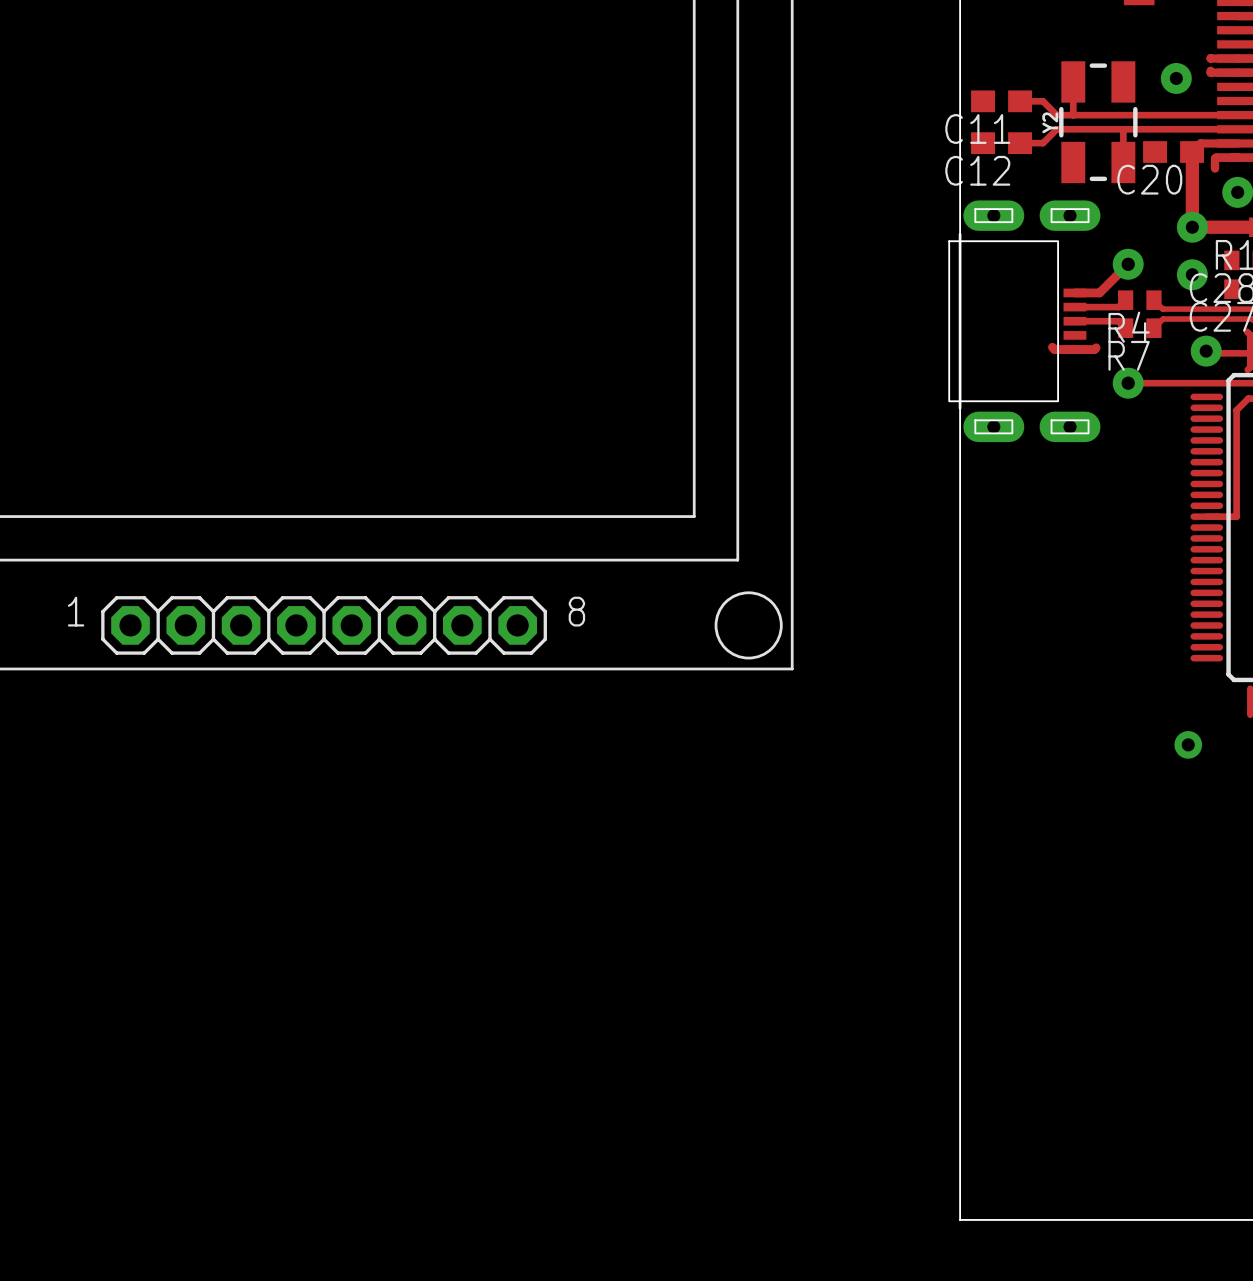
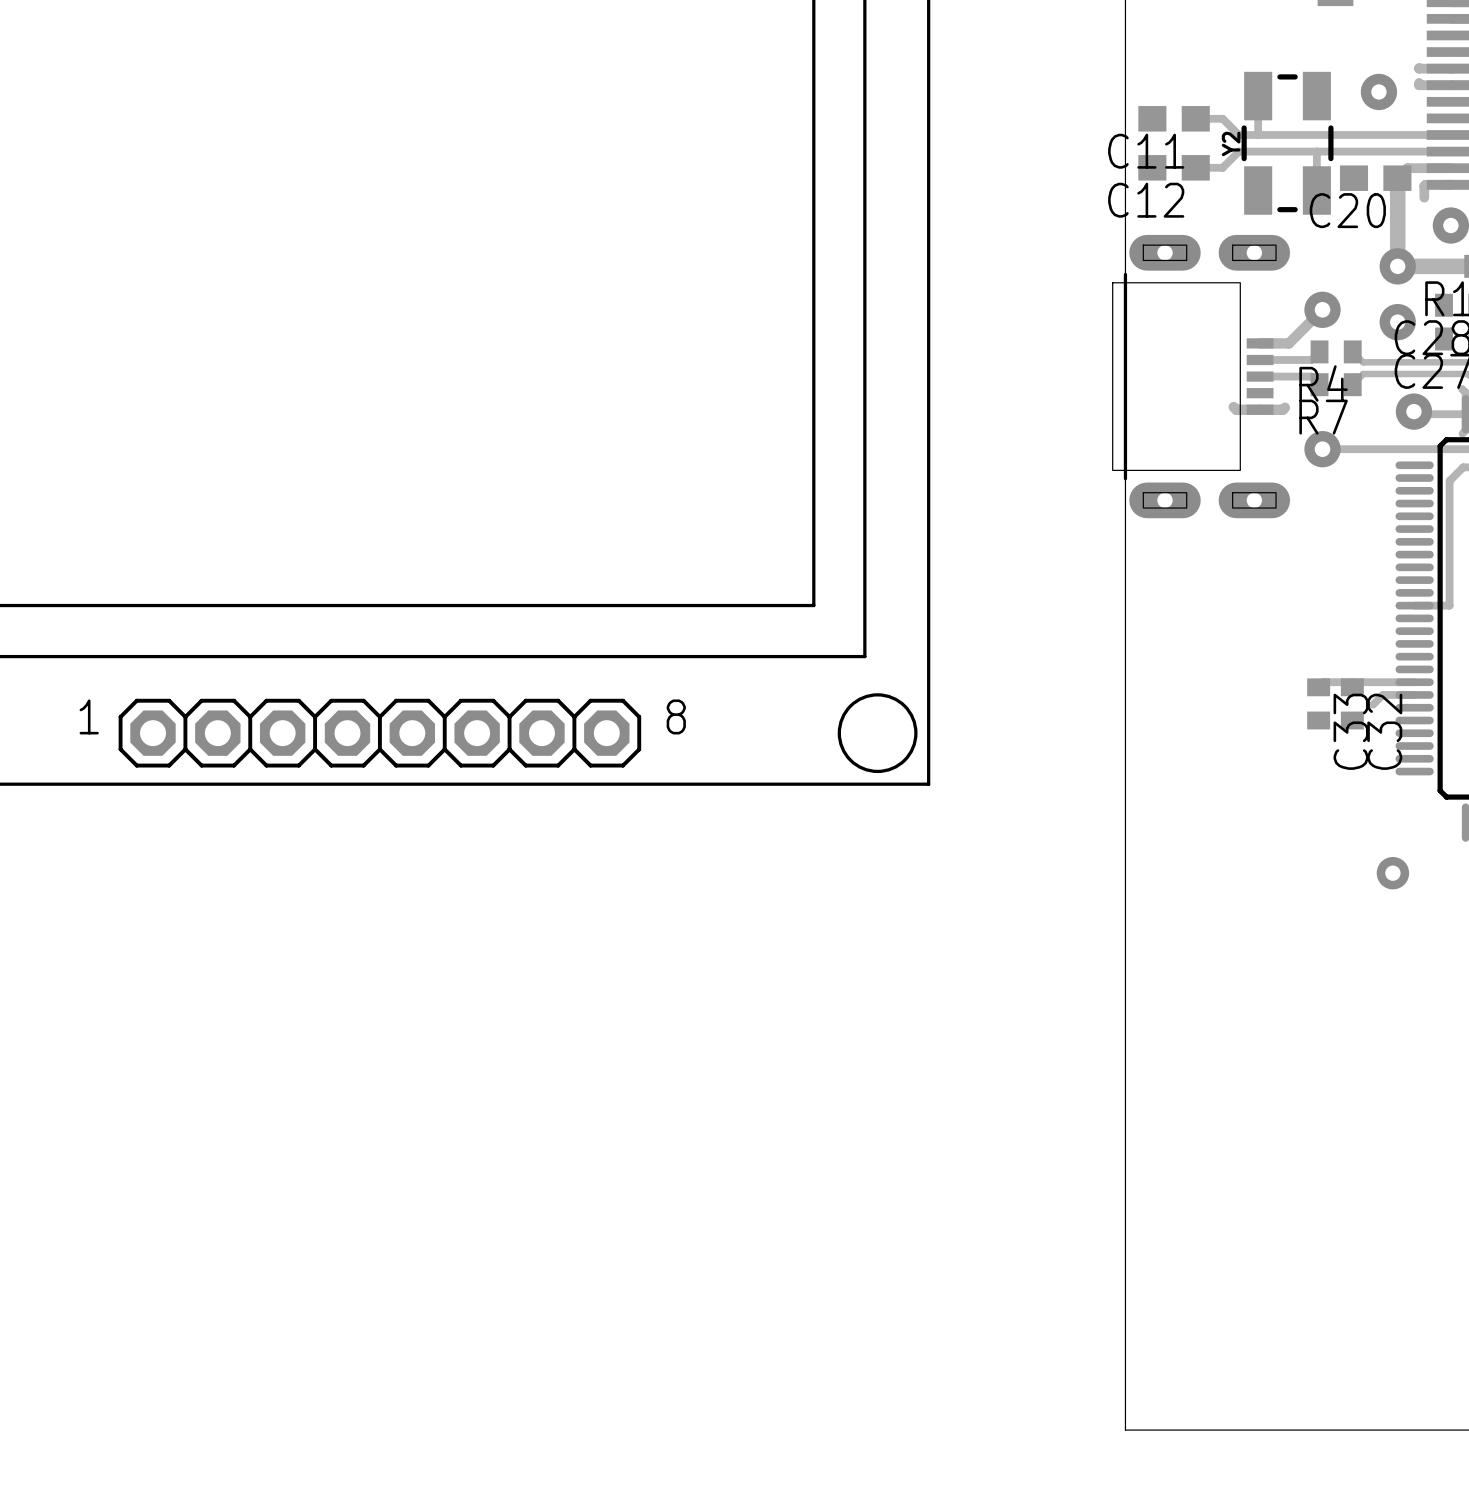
track: none -> (1414, 682) (1323, 682) (1318, 687)
track: none -> (1414, 694) (1382, 694) (1373, 704)
C33: none -> (1318, 703)
C32: none -> (1352, 703)

